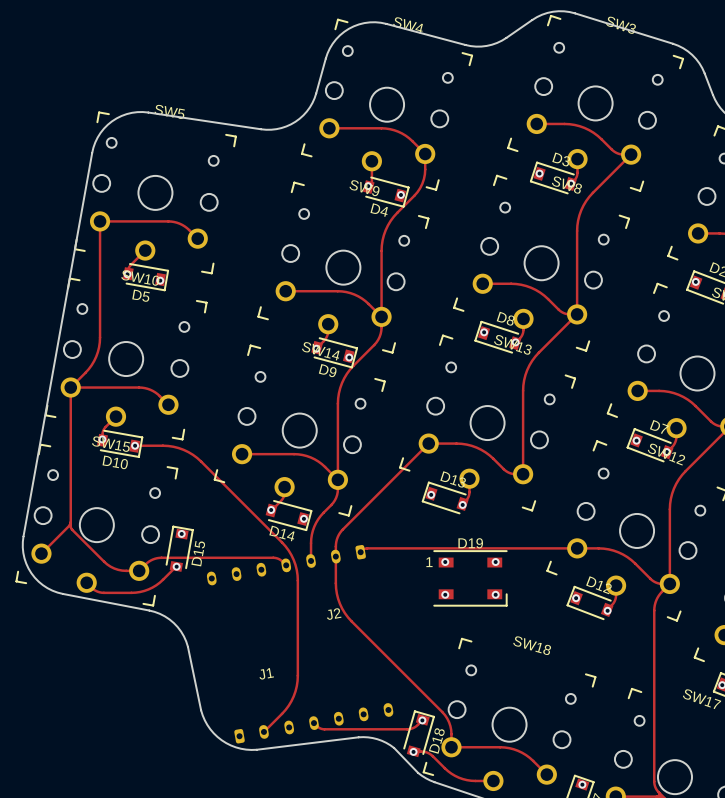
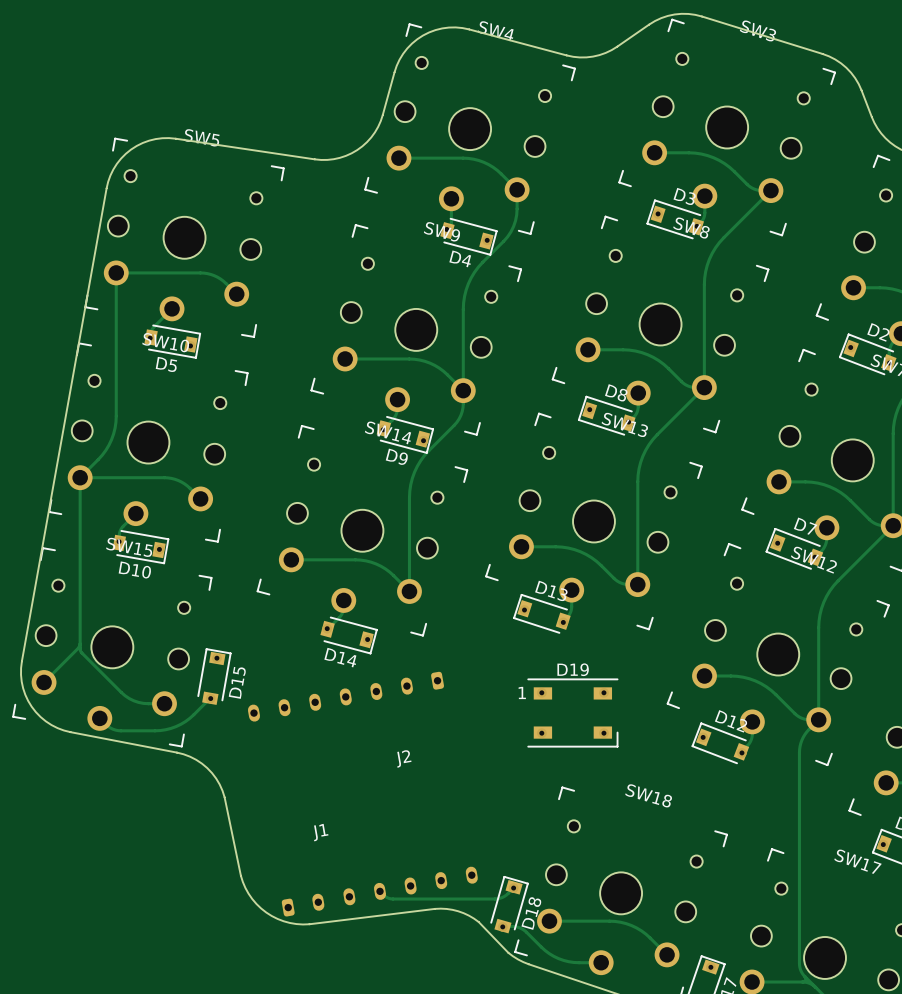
track: (428, 443) (339, 533) (335, 544) (336, 588) (339, 603) (348, 617) (444, 715) (450, 726) (451, 747) -> none
track: (135, 445) (173, 446) (192, 454) (282, 542) (293, 559) (297, 580) (296, 686) (288, 705) (263, 731) -> none
track: (337, 489) (334, 500) (320, 515) (314, 526) (311, 538) (311, 560) -> none
track: (577, 548) (367, 548) (362, 550) -> none
track: (145, 564) (159, 557) (273, 557) (279, 559) (286, 565) -> none

